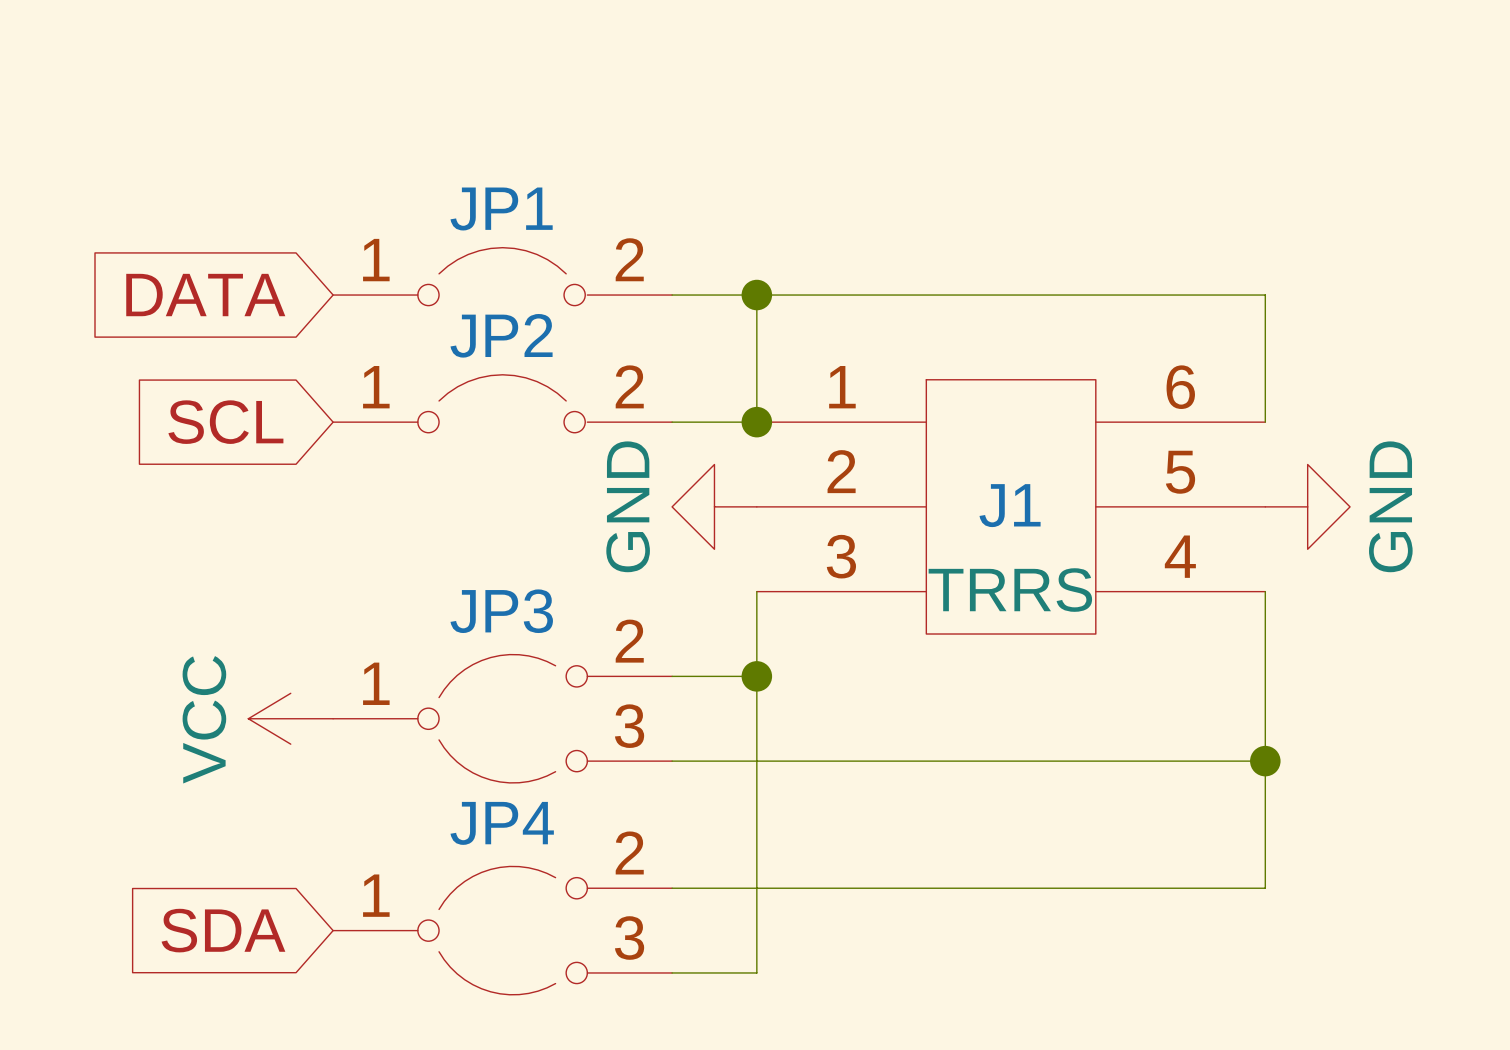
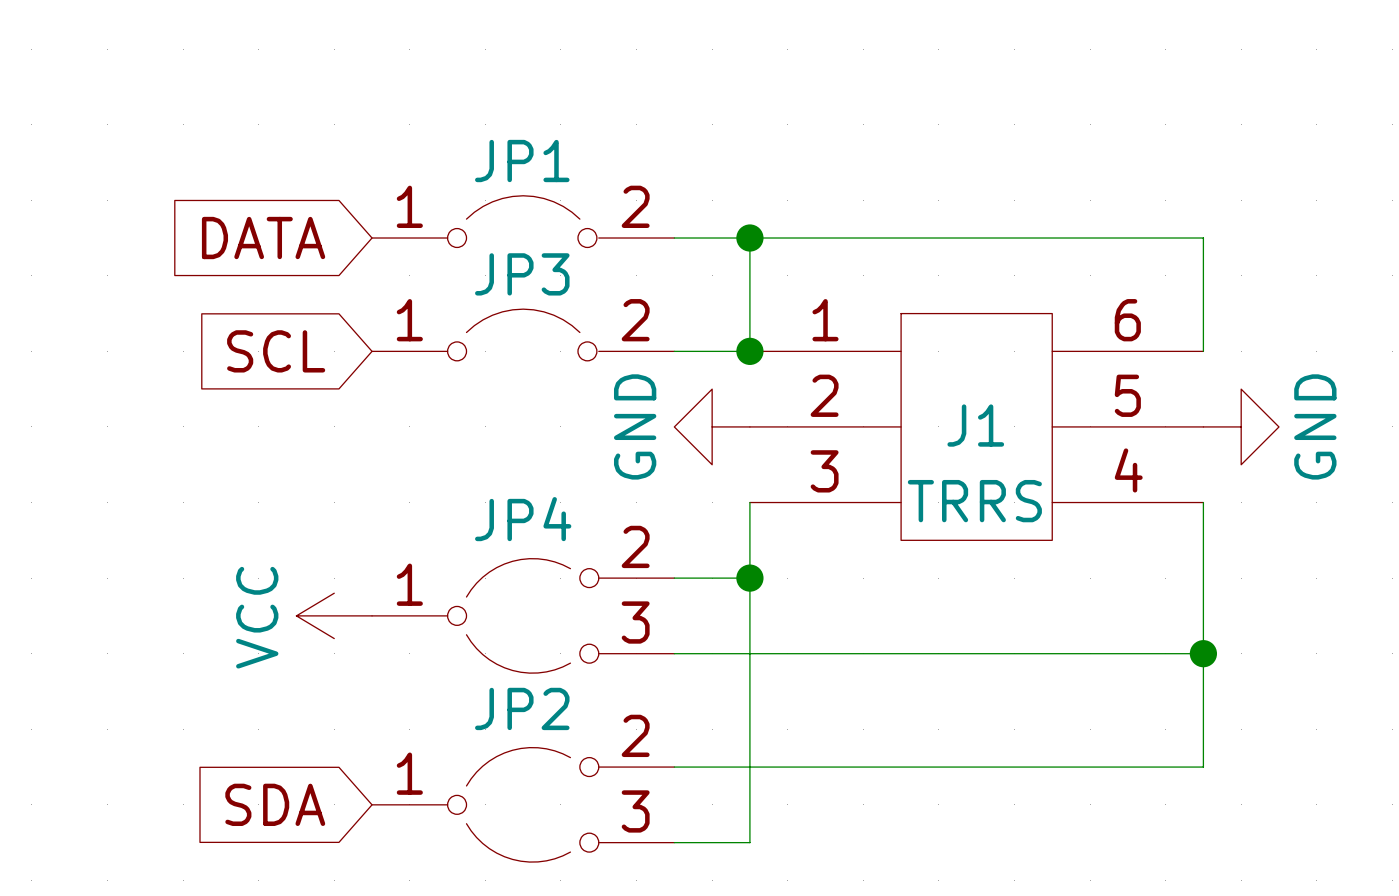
JP2 name: JP2 (501, 335) -> JP3 (522, 274)
JP3 name: JP3 (501, 611) -> JP4 (523, 519)
JP4 name: JP4 (502, 823) -> JP2 (522, 708)

